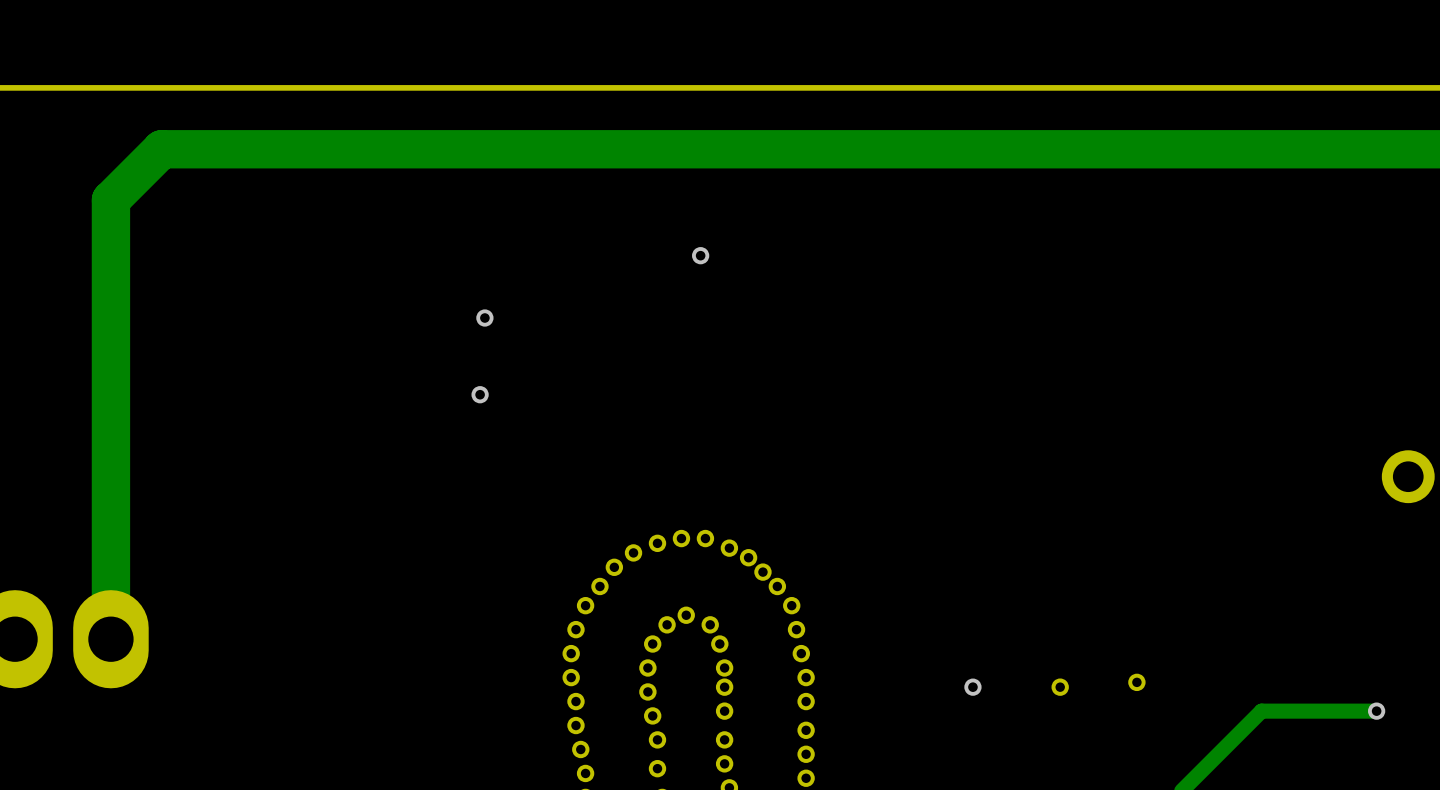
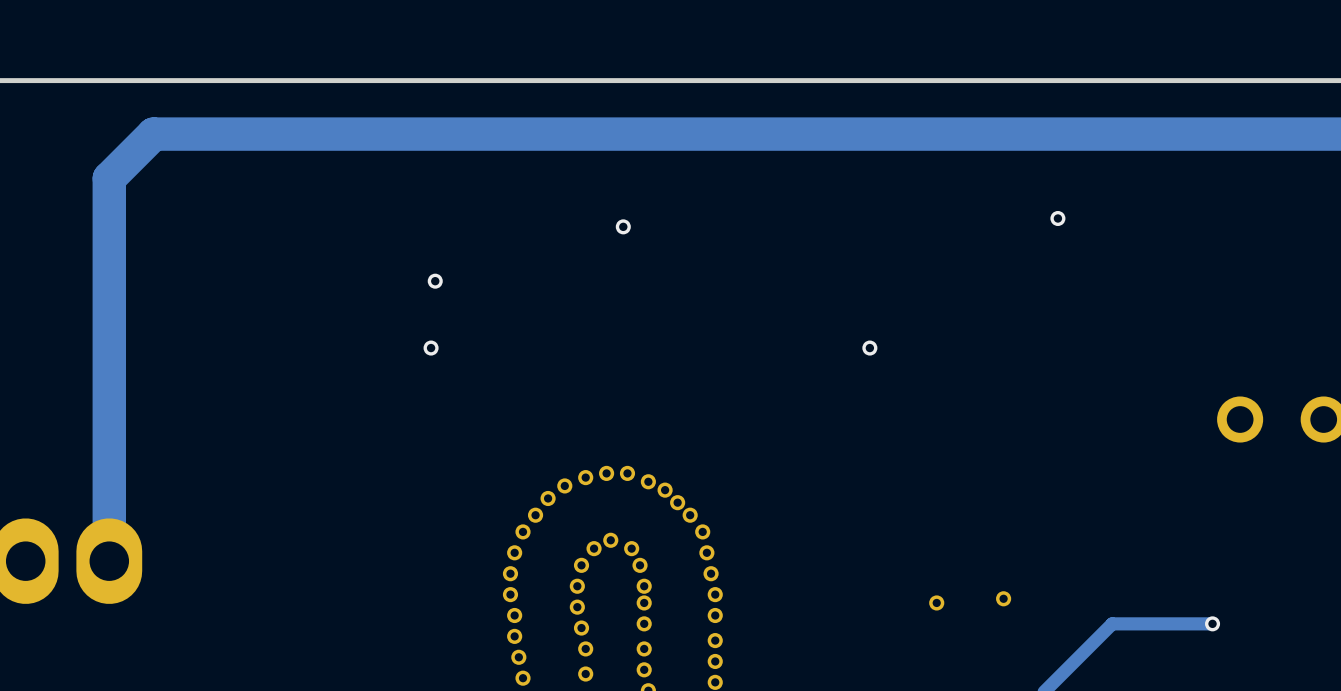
via: none -> (1057, 218)
via: none -> (869, 348)
via: (972, 687) -> none

